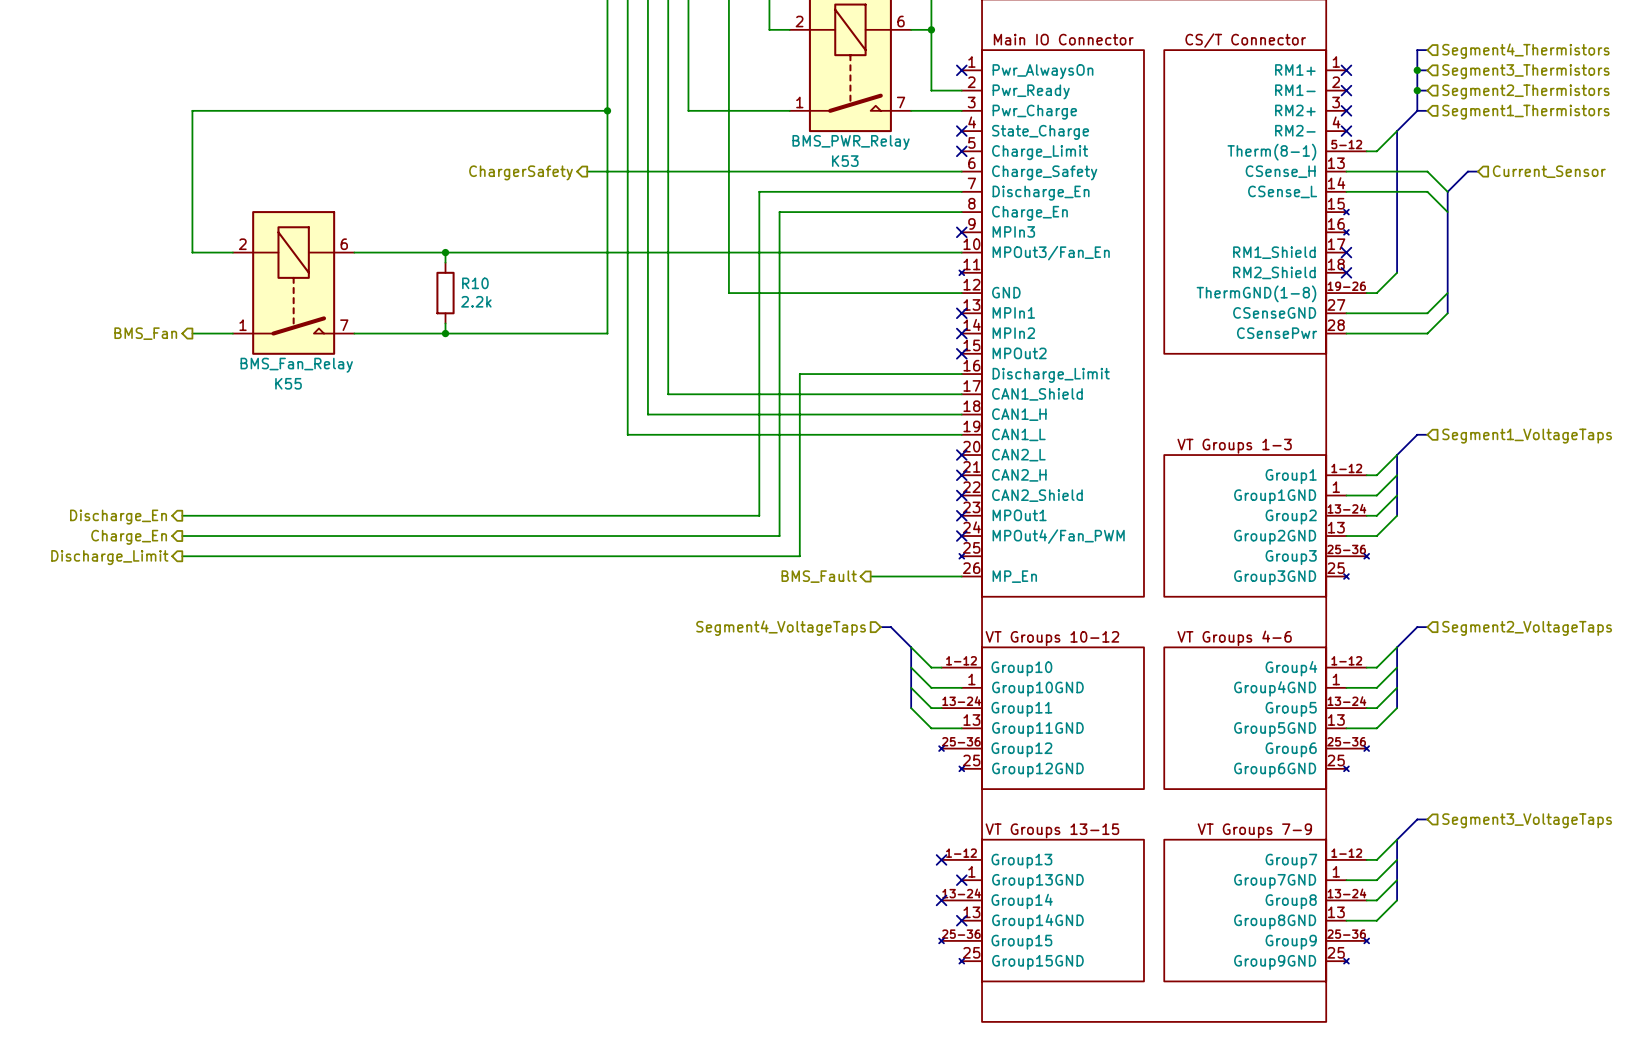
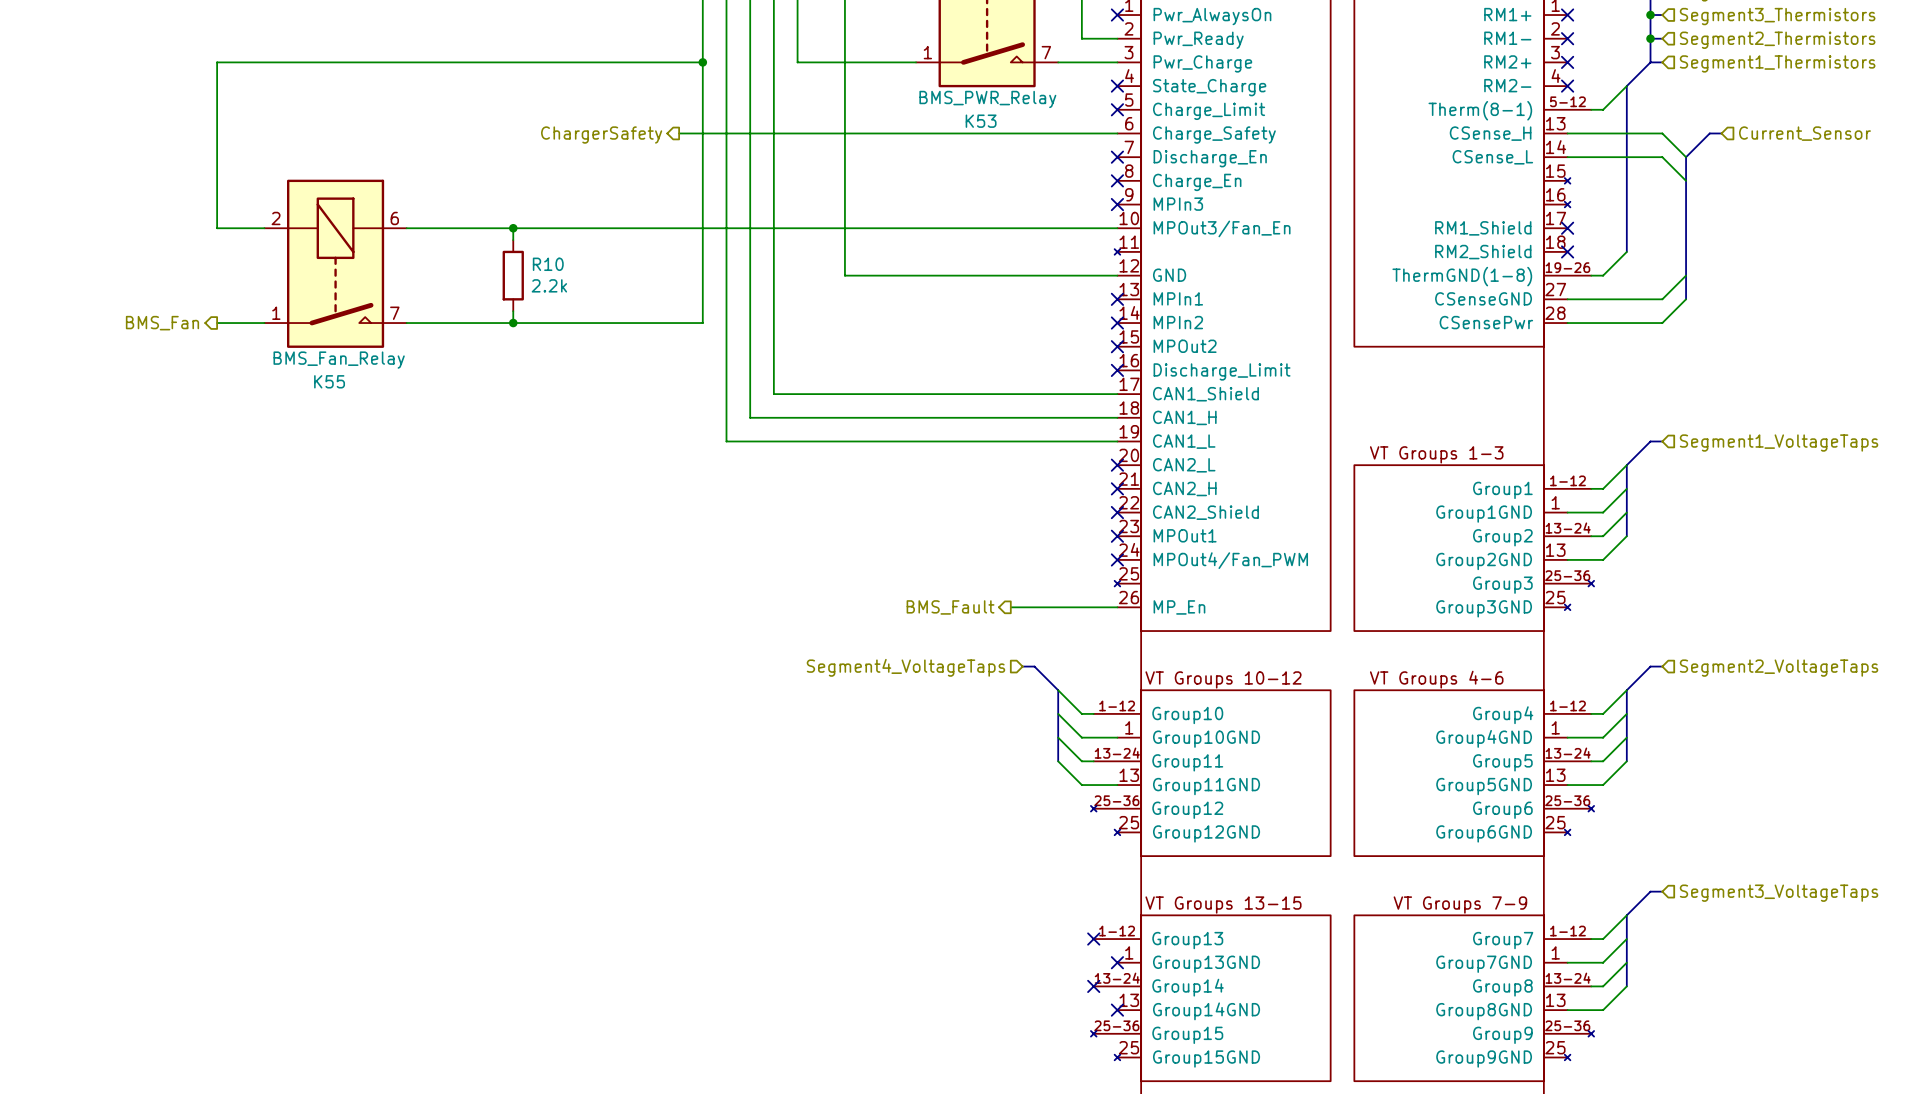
wire: (961, 191) (759, 191) (759, 515) (182, 515) -> none
no-connect mark: none -> (1117, 157)
wire: (961, 212) (779, 212) (779, 536) (182, 536) -> none
no-connect mark: none -> (1117, 180)
wire: (961, 374) (799, 374) (799, 556) (182, 556) -> none
no-connect mark: none -> (1117, 370)
hierarchical label: Discharge_En (118, 517) -> none
hierarchical label: Charge_En (129, 537) -> none
hierarchical label: Discharge_Limit (109, 557) -> none

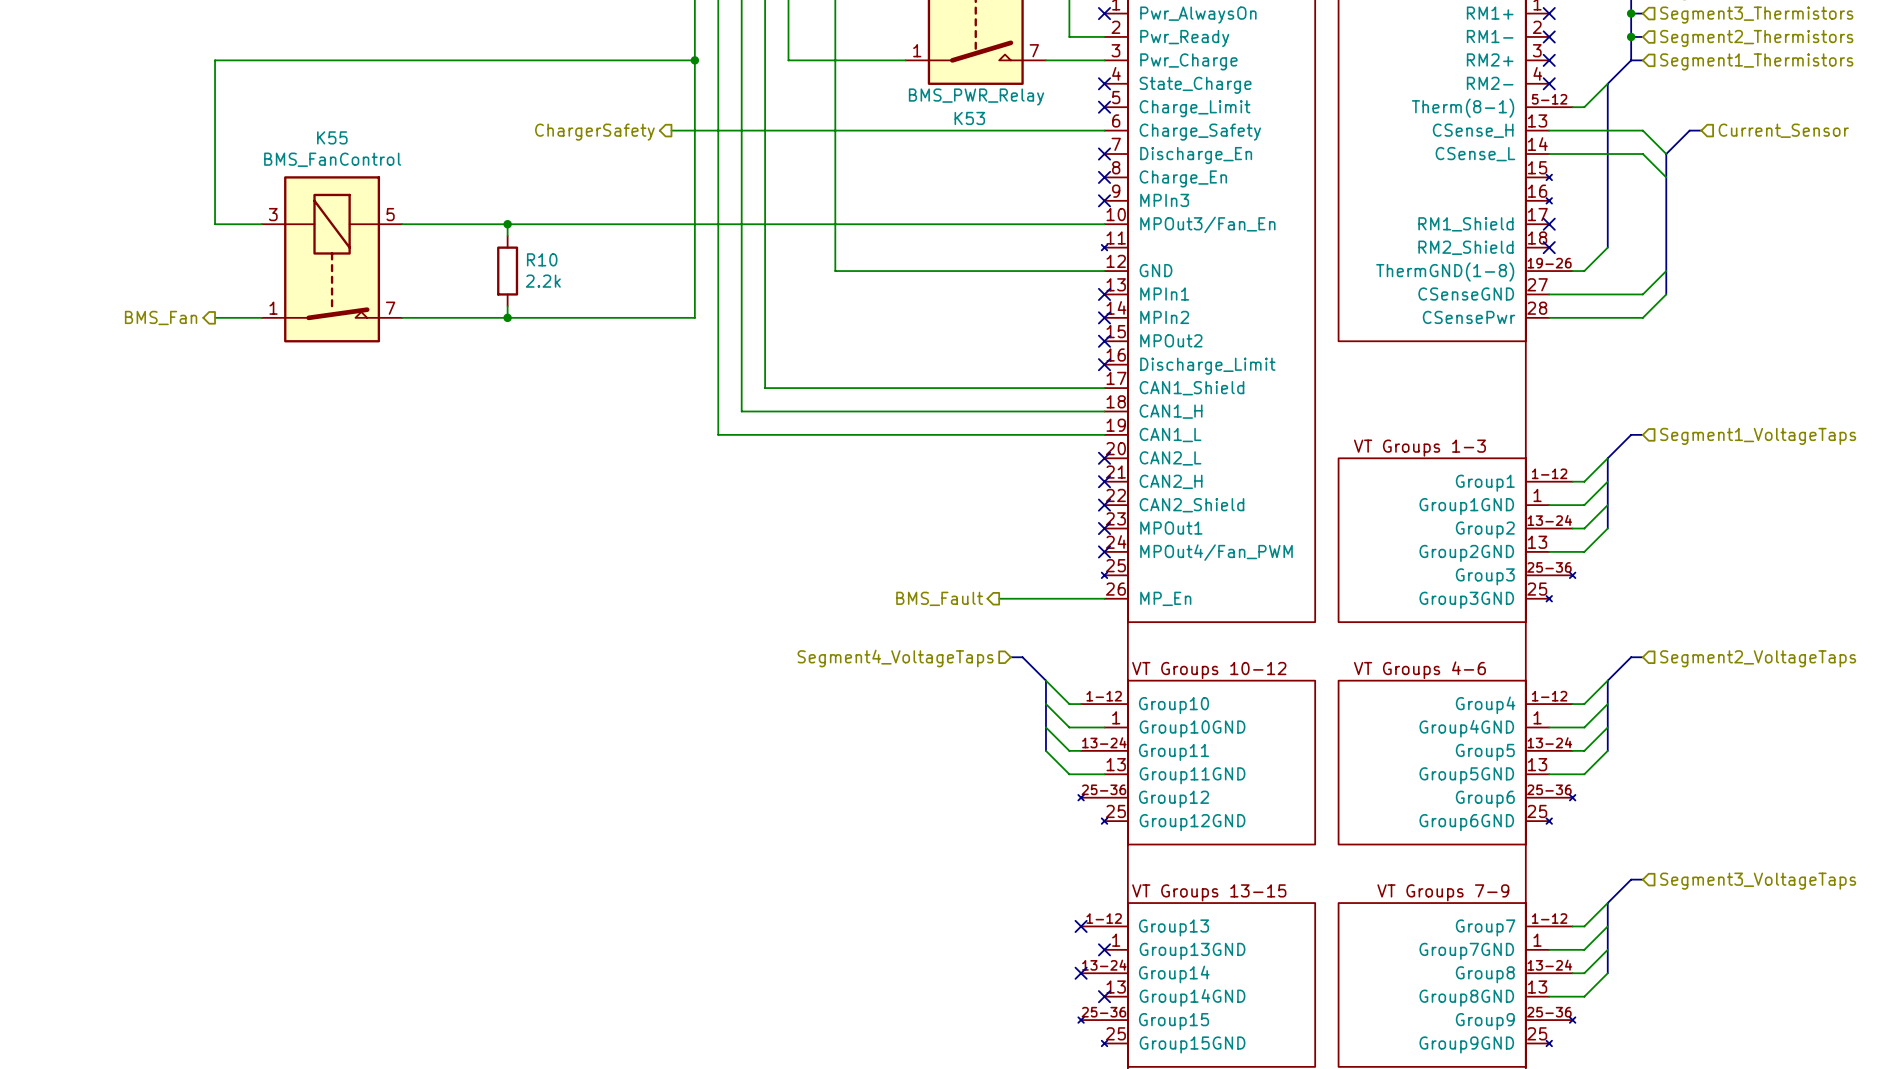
K55 symbol: [264, 179, 407, 348] -> [261, 176, 403, 343]
K55 value: BMS_Fan_Relay (339, 360) -> BMS_FanControl (332, 159)
K55 name position: K55 (329, 381) -> K55 (332, 137)

